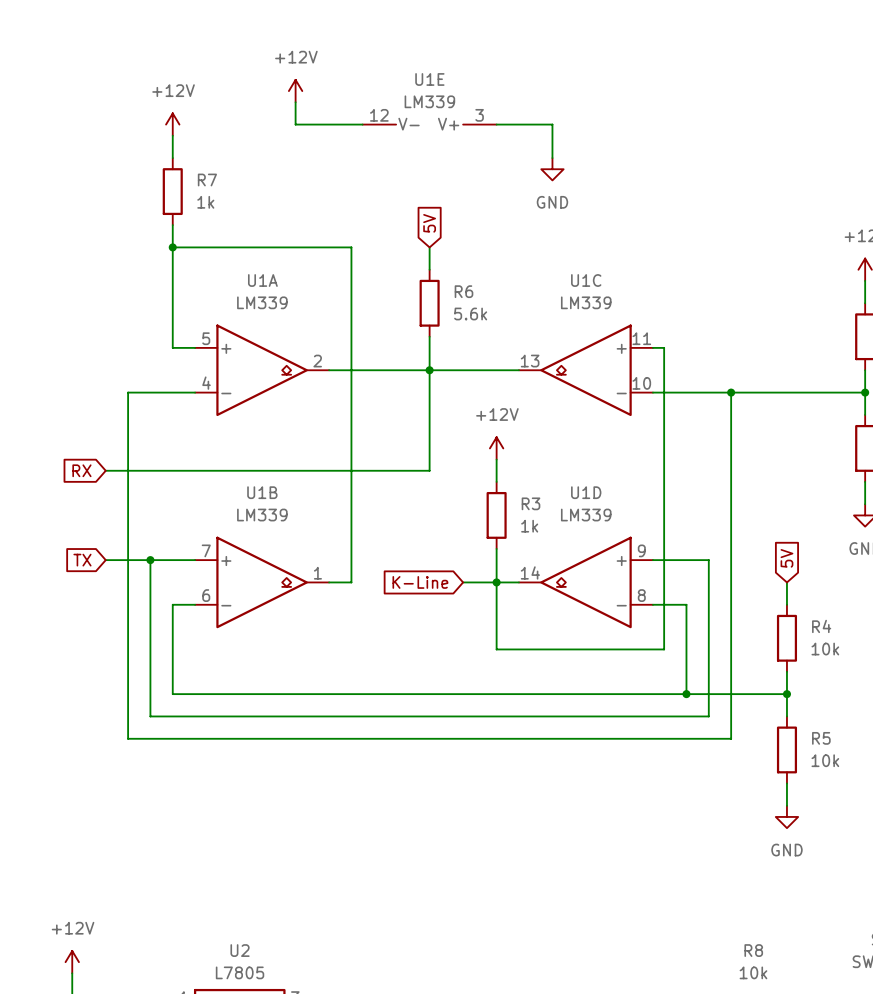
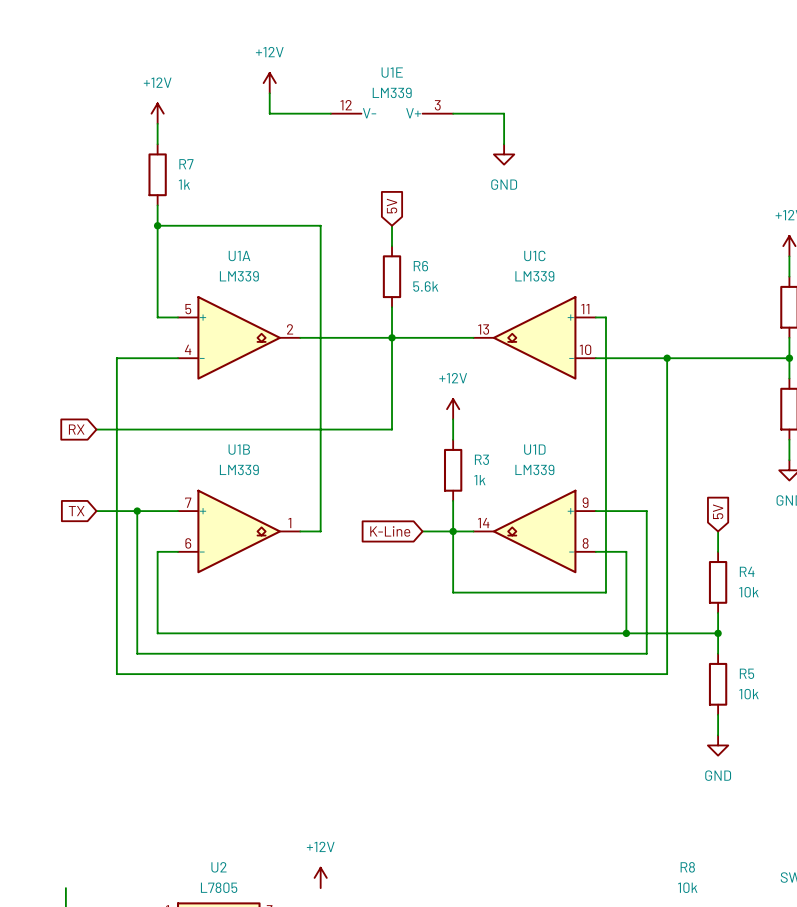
power symbol: +12V (72, 962) -> none
power symbol: none -> +12V (320, 877)

